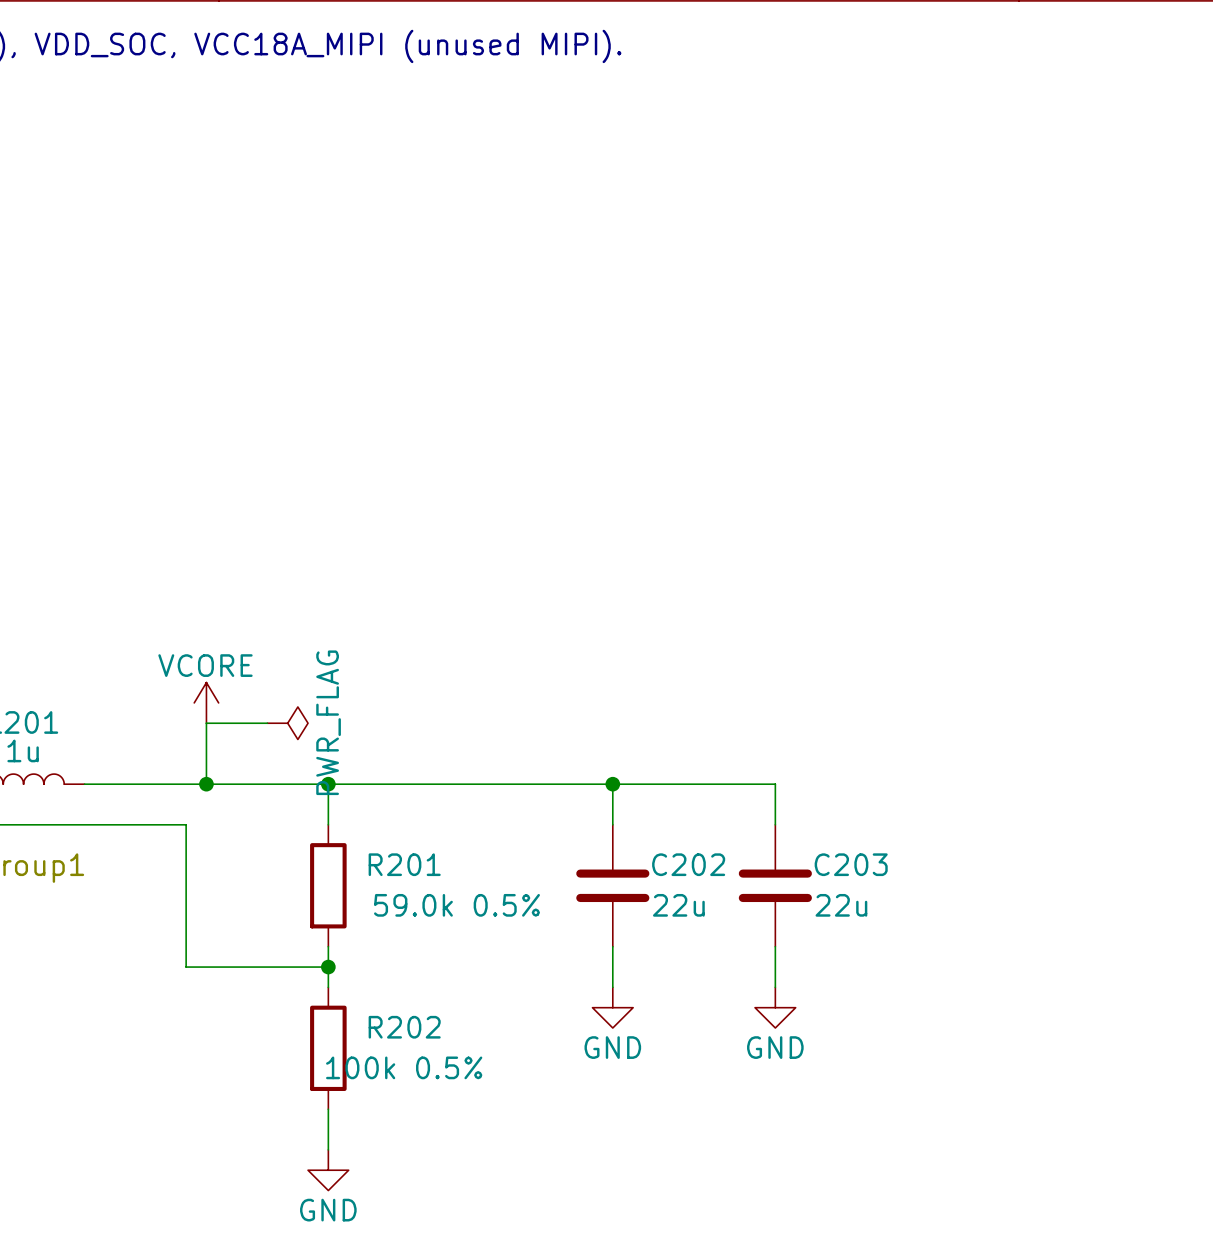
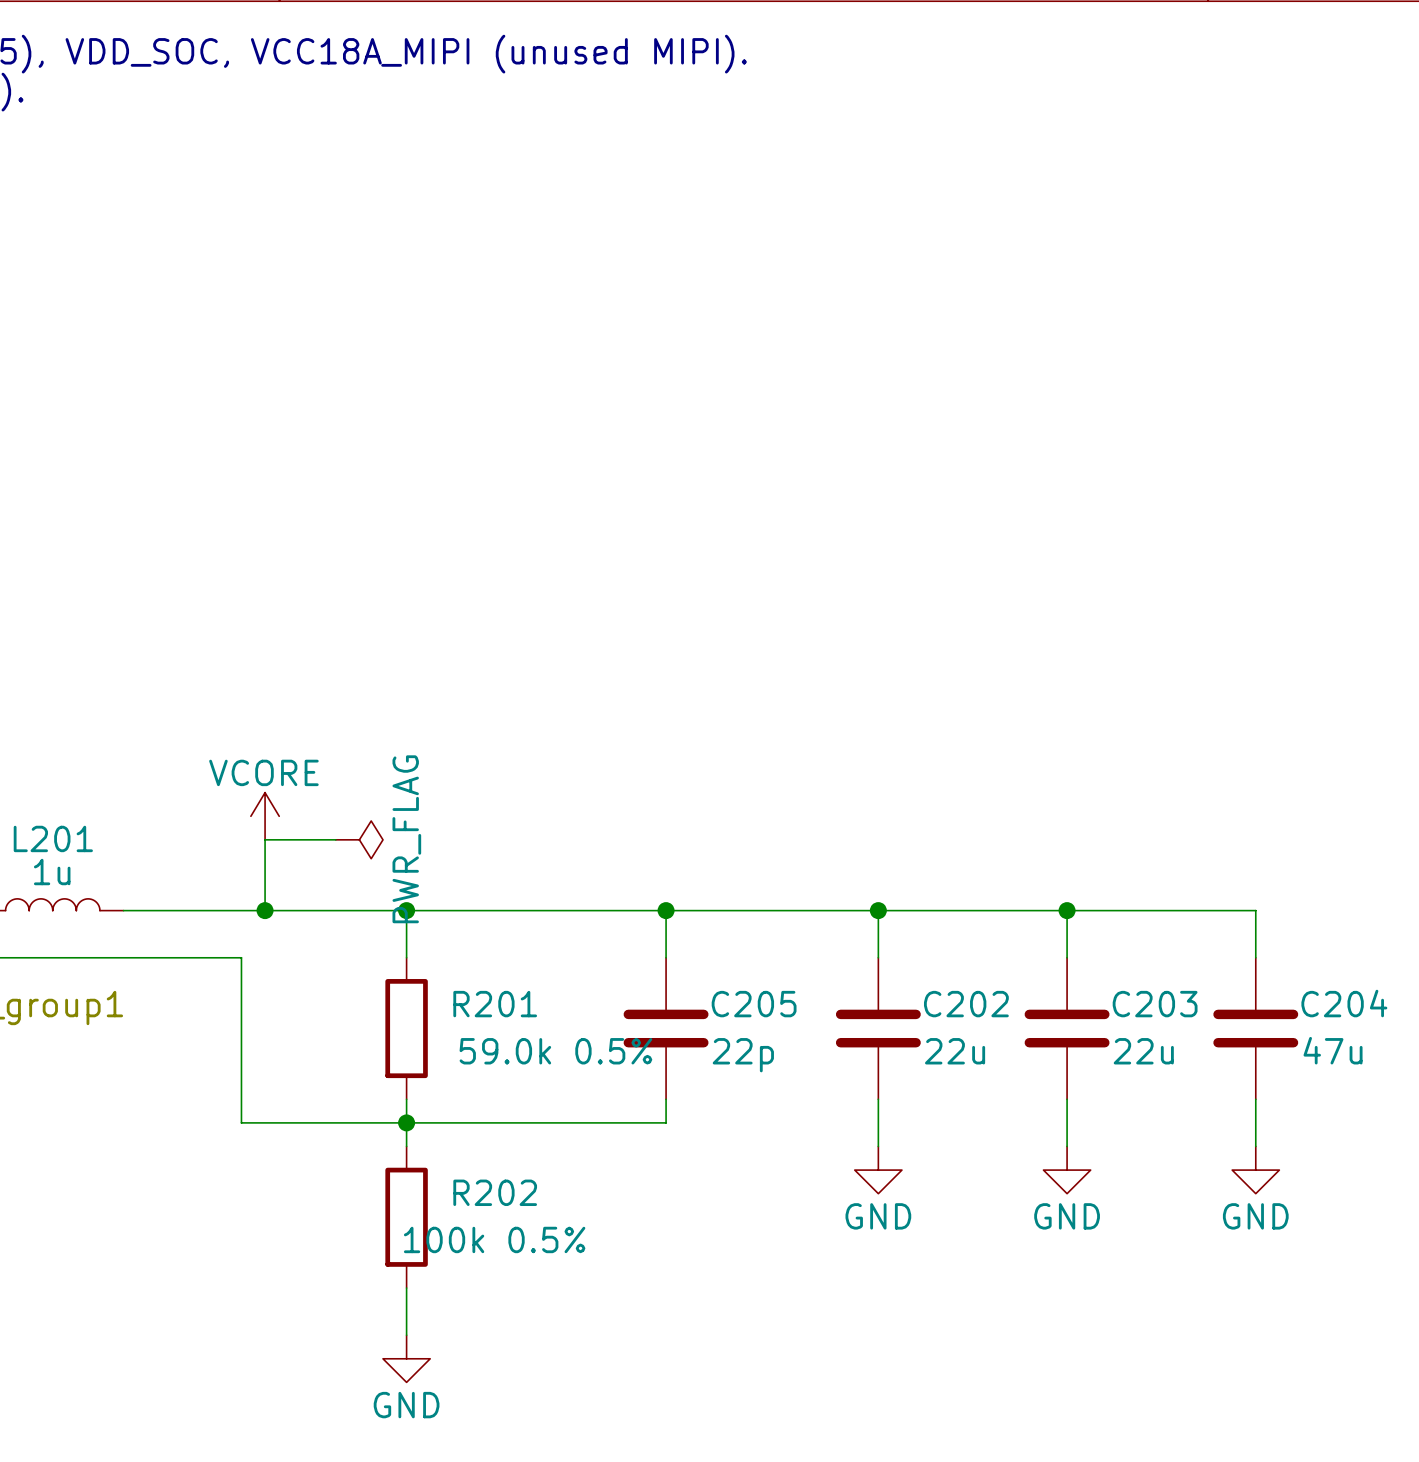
wire: none -> (666, 910) (666, 957)
junction: none -> (666, 910)
wire: (612, 784) (612, 824) -> (878, 910) (878, 957)
junction: (612, 784) -> none
junction: none -> (878, 910)
wire: (775, 784) (775, 824) -> (925, 910) (1255, 910) (1255, 957)
wire: none -> (1067, 910) (1067, 957)
junction: none -> (1067, 910)
C205: none -> 22p (666, 1028)
C202 position: (612, 885) -> (878, 1028)
C203 position: (775, 885) -> (1067, 1028)
C204: none -> 47u (1255, 1028)
wire: none -> (666, 1099) (666, 1122) (406, 1122)
wire: (612, 946) (612, 987) -> (878, 1099) (878, 1146)
wire: (775, 946) (775, 987) -> (1067, 1099) (1067, 1146)
wire: none -> (1255, 1099) (1255, 1146)
power symbol: GND (612, 1007) -> none
power symbol position: GND (775, 1007) -> GND (878, 1170)
power symbol: none -> GND (1067, 1170)
power symbol: none -> GND (1255, 1170)

